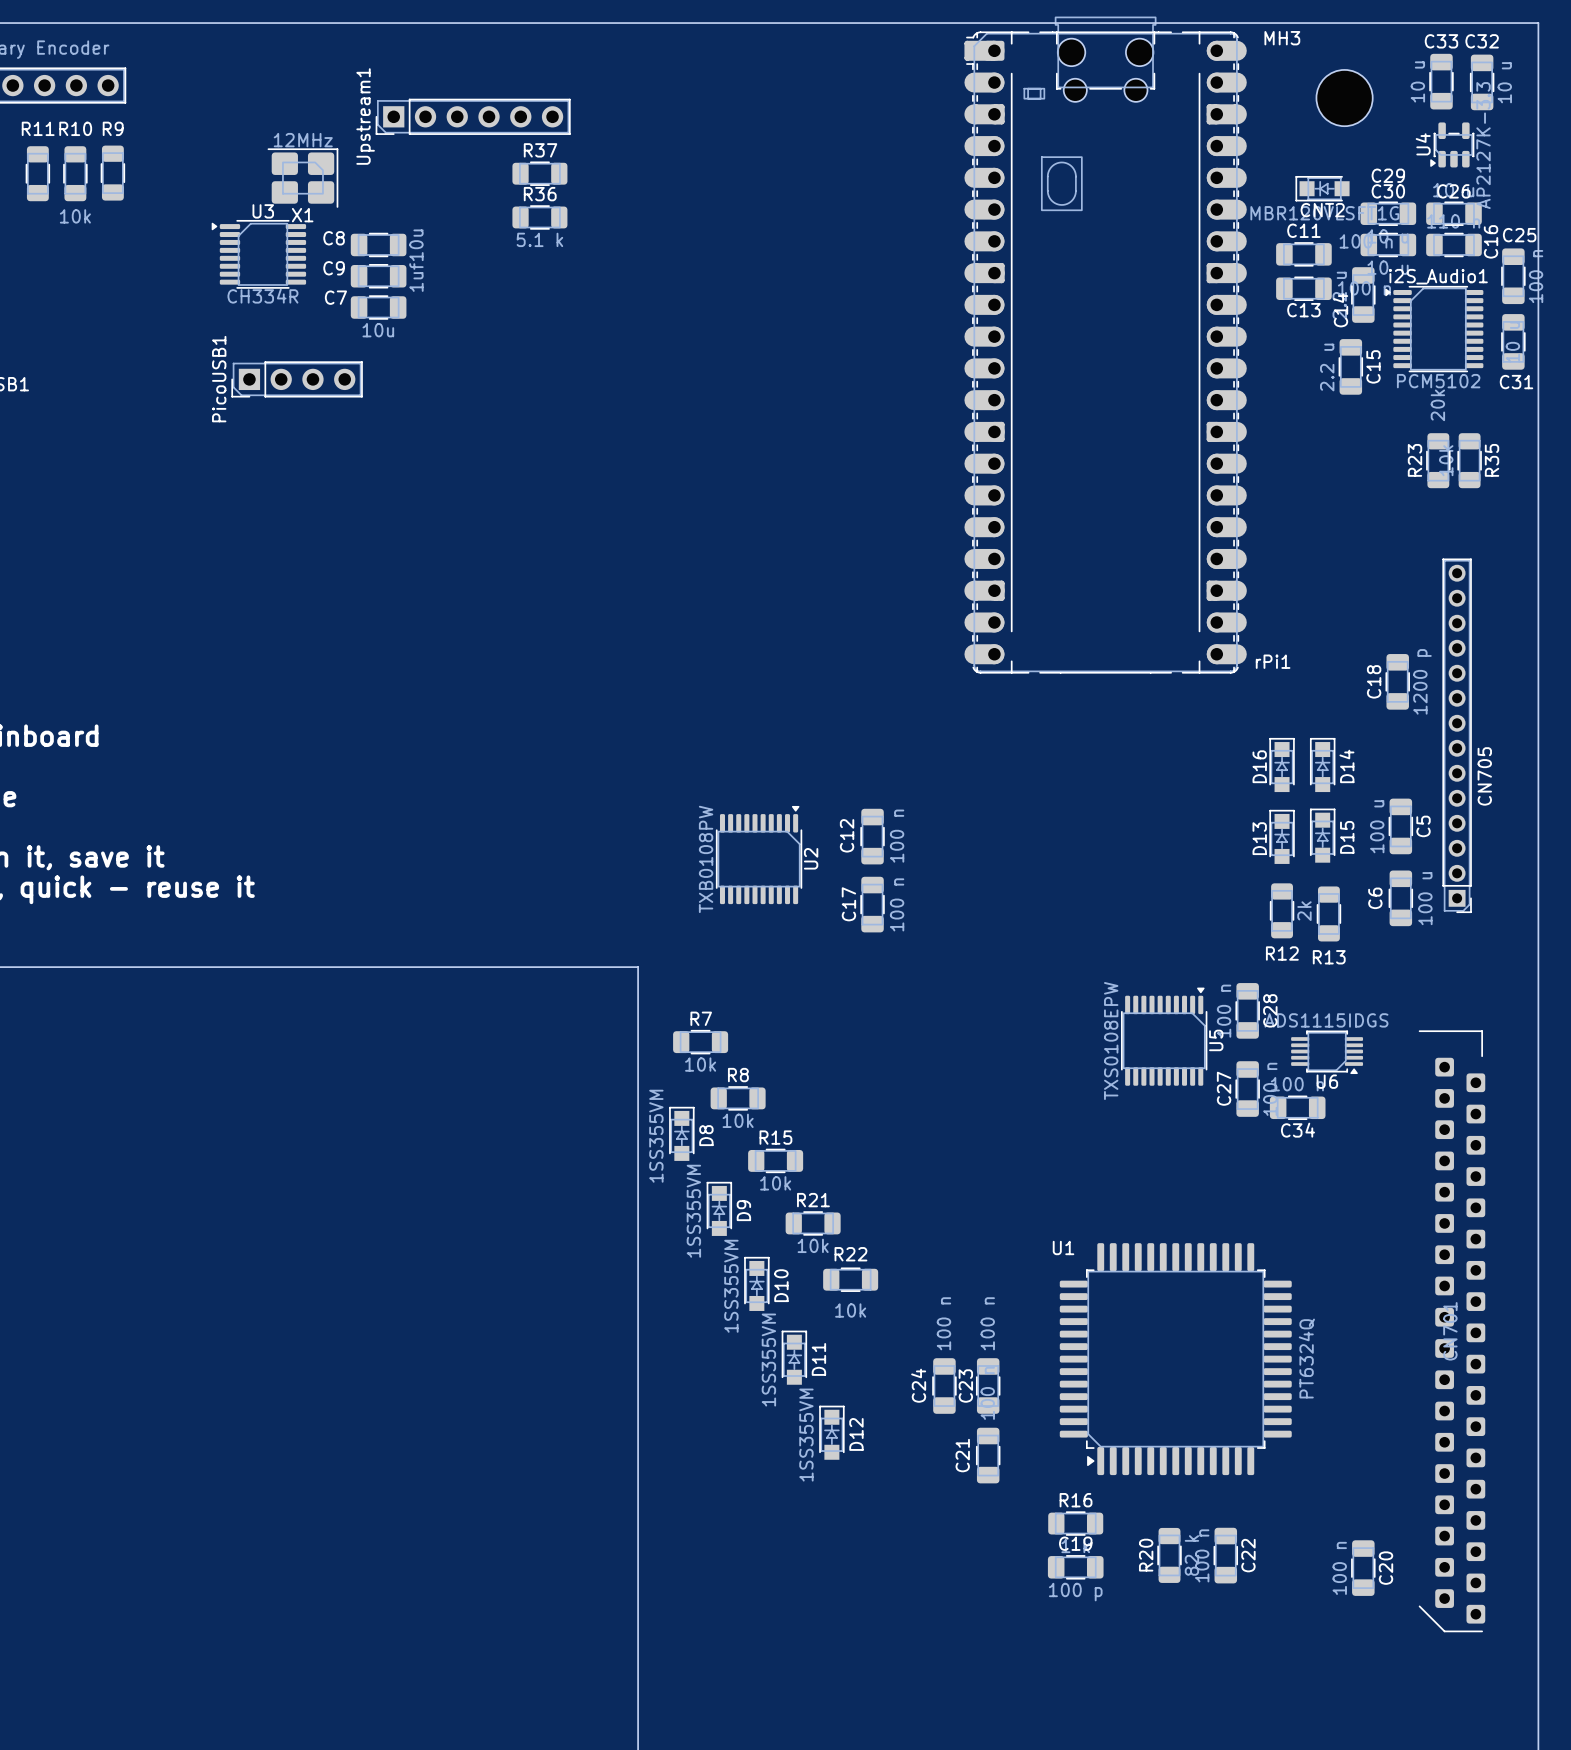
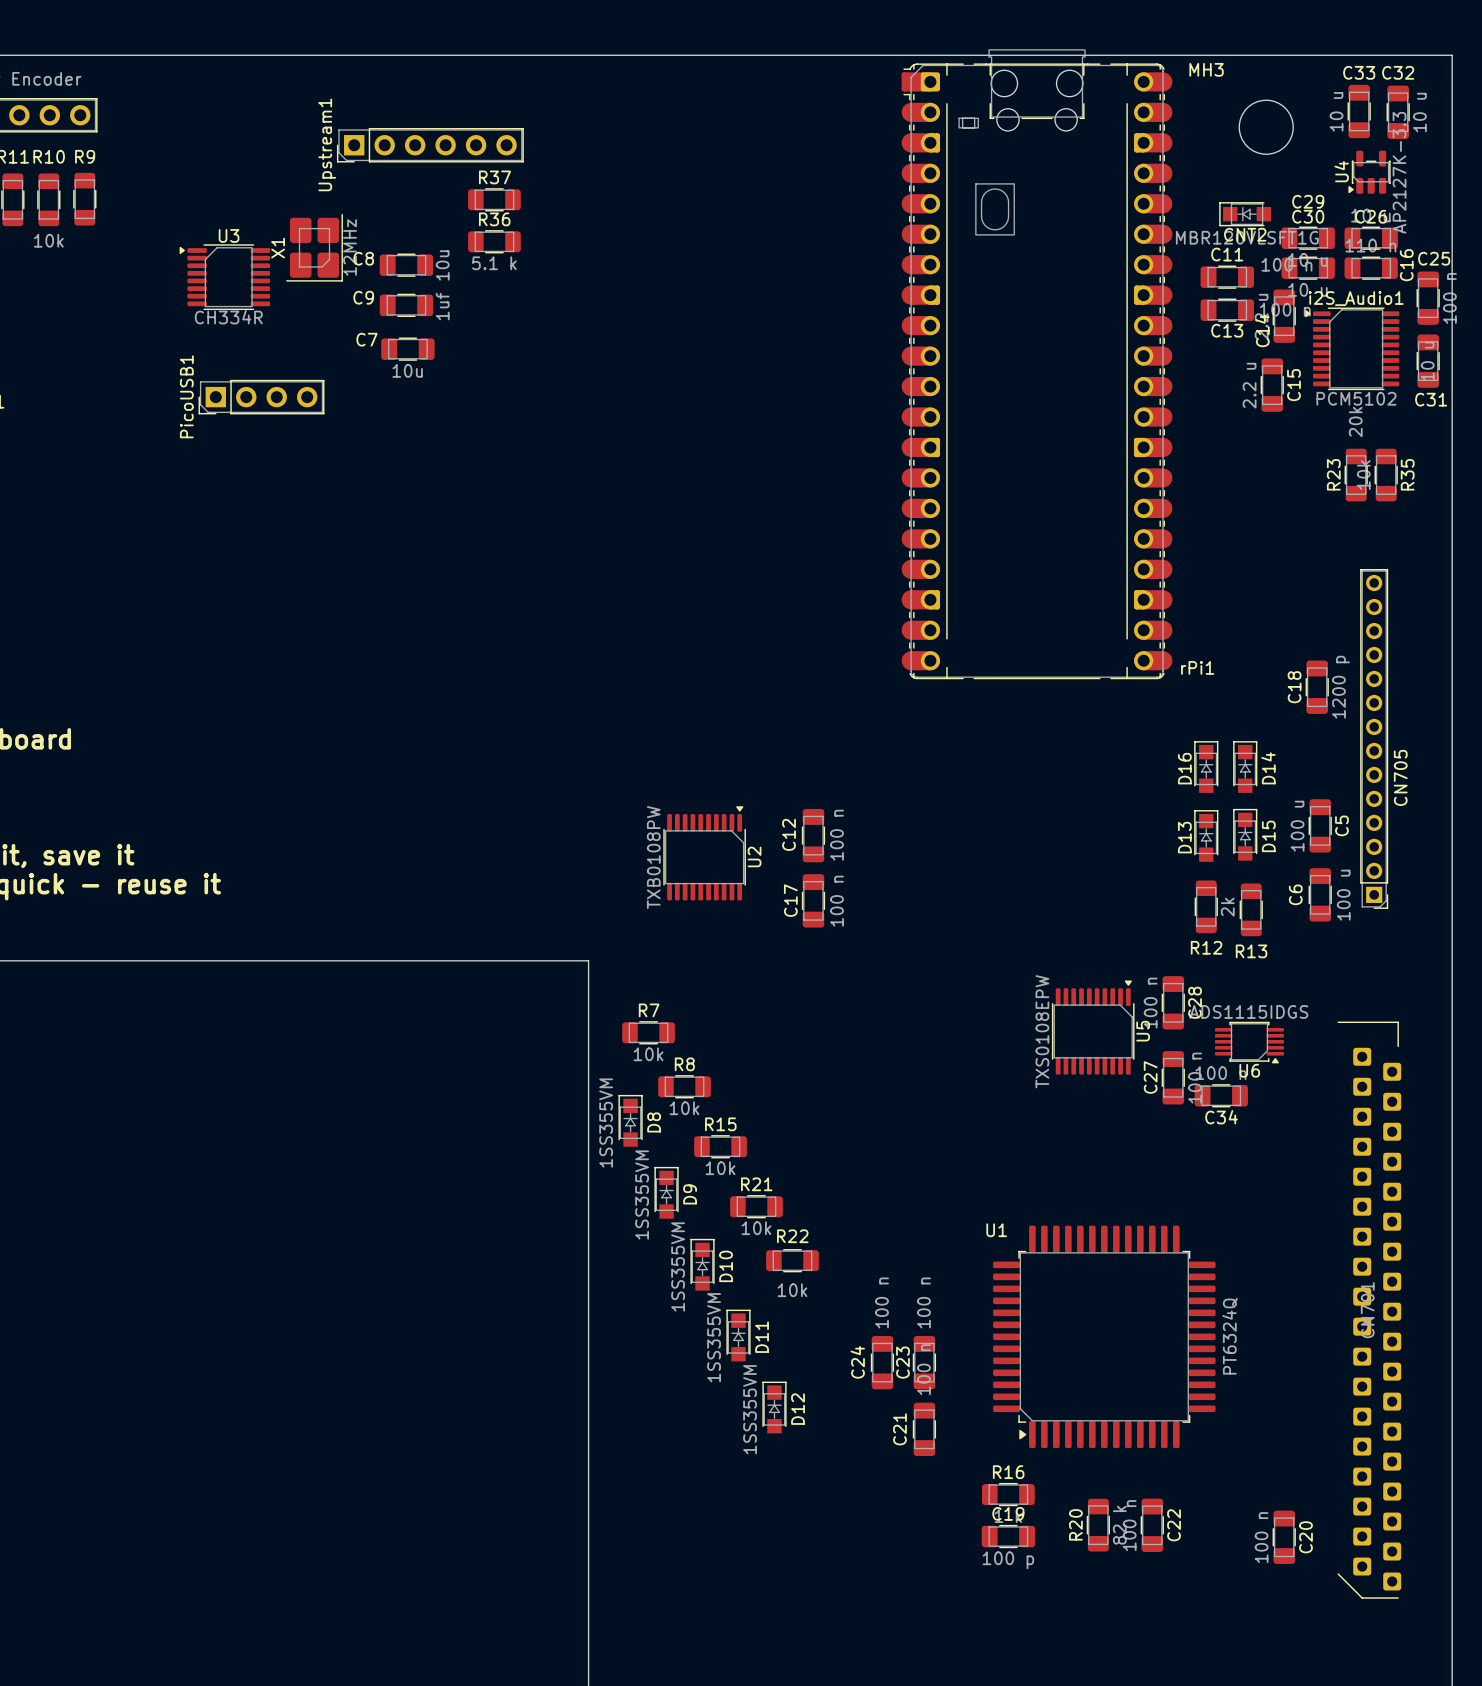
X1 rotation: 0° (302, 178) -> 90° clockwise (314, 247)
X1 position: (302, 178) -> (314, 247)
C8 position: (378, 244) -> (406, 265)
C9 position: (378, 276) -> (406, 305)
C7 position: (378, 307) -> (407, 349)

